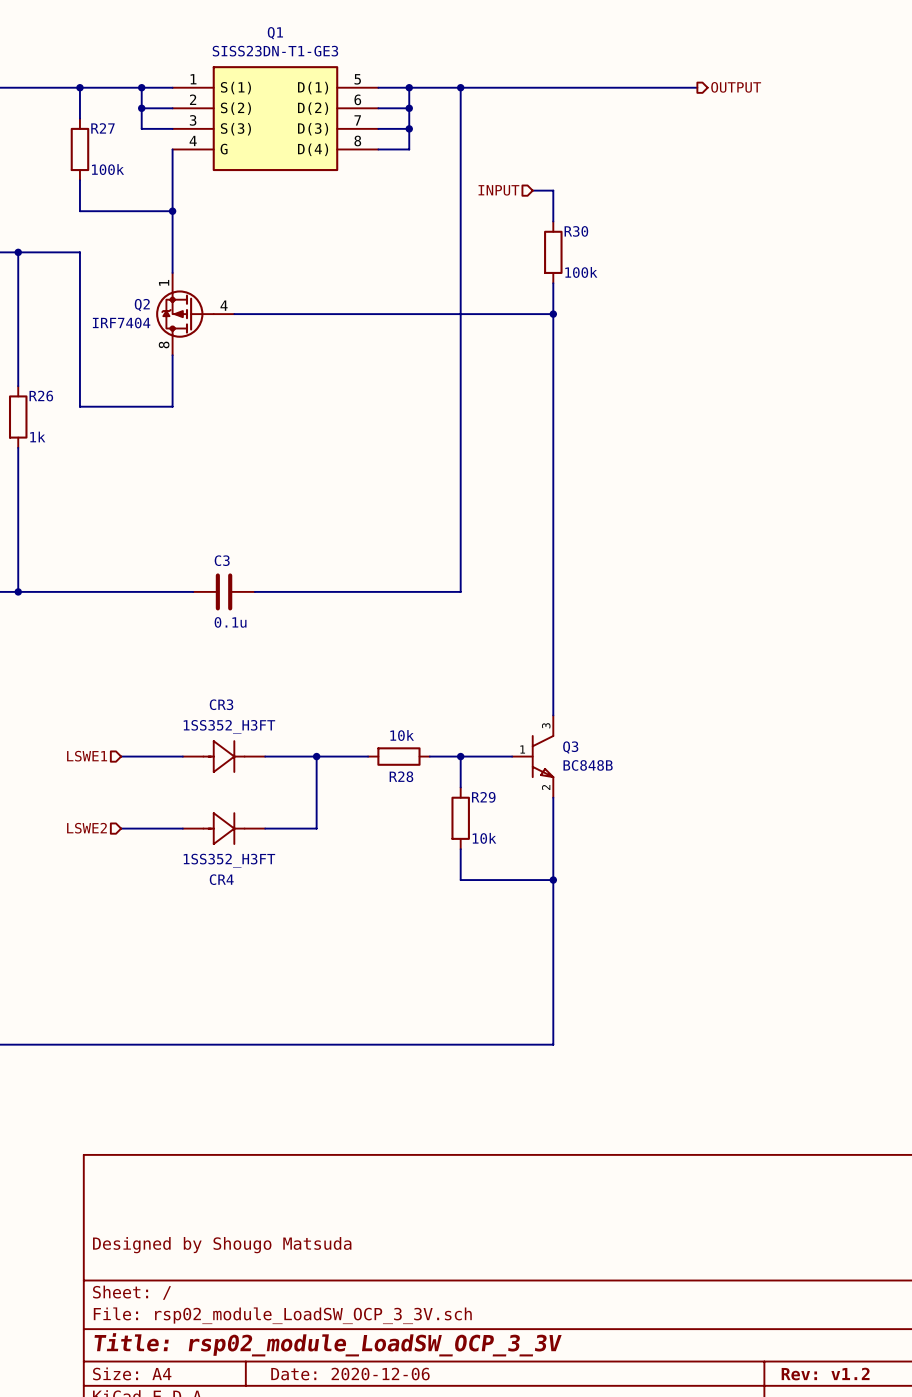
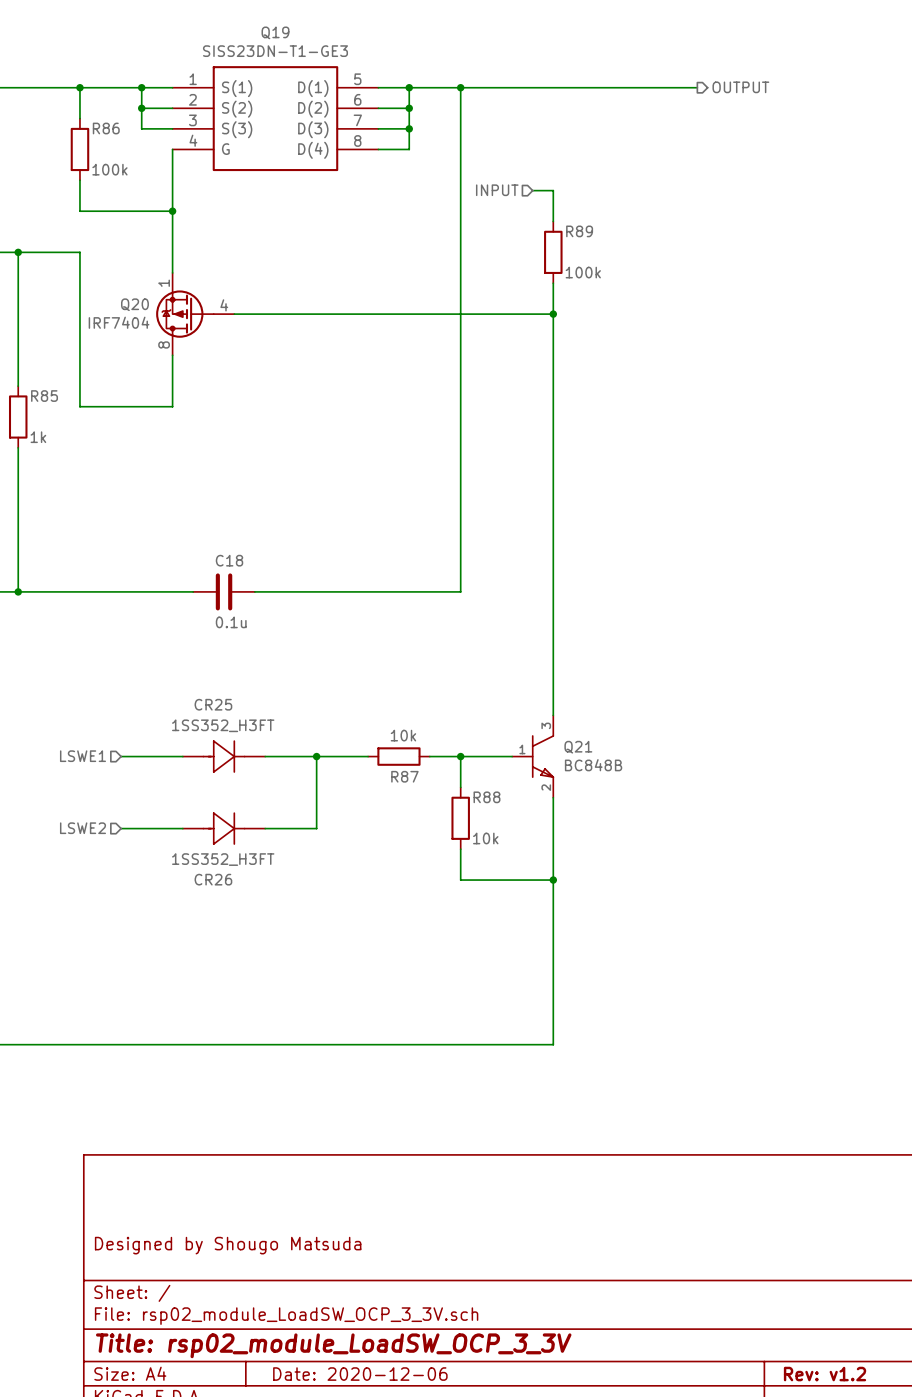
Q1 name: Q1 (275, 33) -> Q19 (275, 32)
R27 name: R27 (102, 128) -> R86 (106, 128)
R30 name: R30 (576, 231) -> R89 (579, 231)
Q2 name: Q2 (142, 305) -> Q20 (134, 304)
R26 name: R26 (41, 396) -> R85 (44, 396)
C3 name: C3 (222, 560) -> C18 (229, 560)
CR3 name: CR3 (221, 704) -> CR25 (213, 704)
Q3 name: Q3 (570, 747) -> Q21 (578, 747)
R28 name: R28 (401, 776) -> R87 (404, 776)
R29 name: R29 (483, 797) -> R88 (486, 797)
CR4 name: CR4 (221, 879) -> CR26 (213, 879)

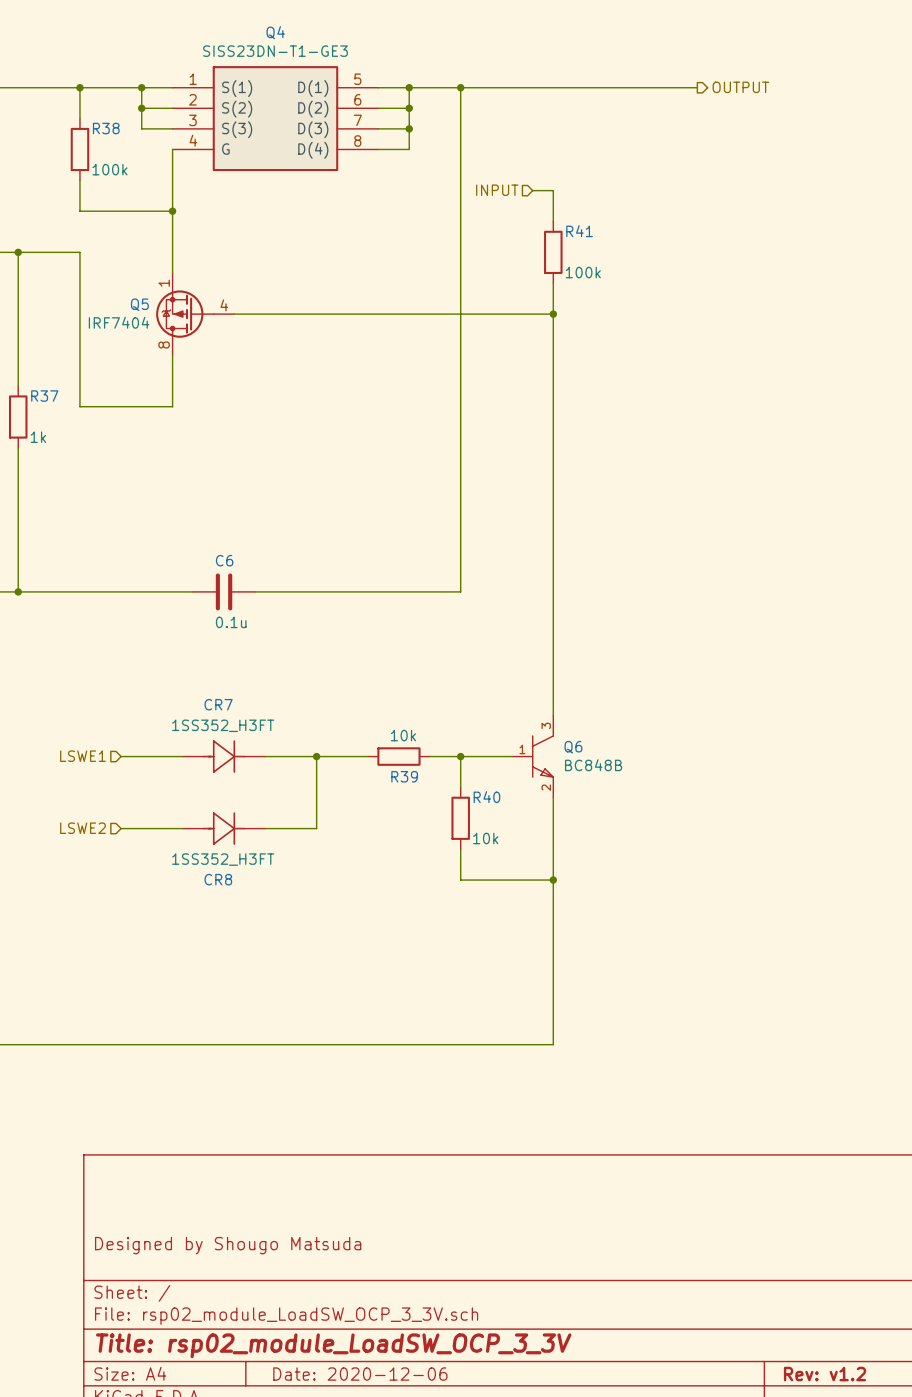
Q19 name: Q19 (275, 32) -> Q4 (275, 32)
R86 name: R86 (106, 128) -> R38 (106, 128)
R89 name: R89 (579, 231) -> R41 (579, 231)
Q20 name: Q20 (134, 304) -> Q5 (139, 304)
R85 name: R85 (44, 396) -> R37 (44, 396)
C18 name: C18 (229, 560) -> C6 (224, 560)
CR25 name: CR25 (213, 704) -> CR7 (218, 704)
Q21 name: Q21 (578, 747) -> Q6 (573, 747)
R87 name: R87 (404, 776) -> R39 (404, 776)
R88 name: R88 (486, 797) -> R40 (486, 797)
CR26 name: CR26 (213, 879) -> CR8 (218, 879)

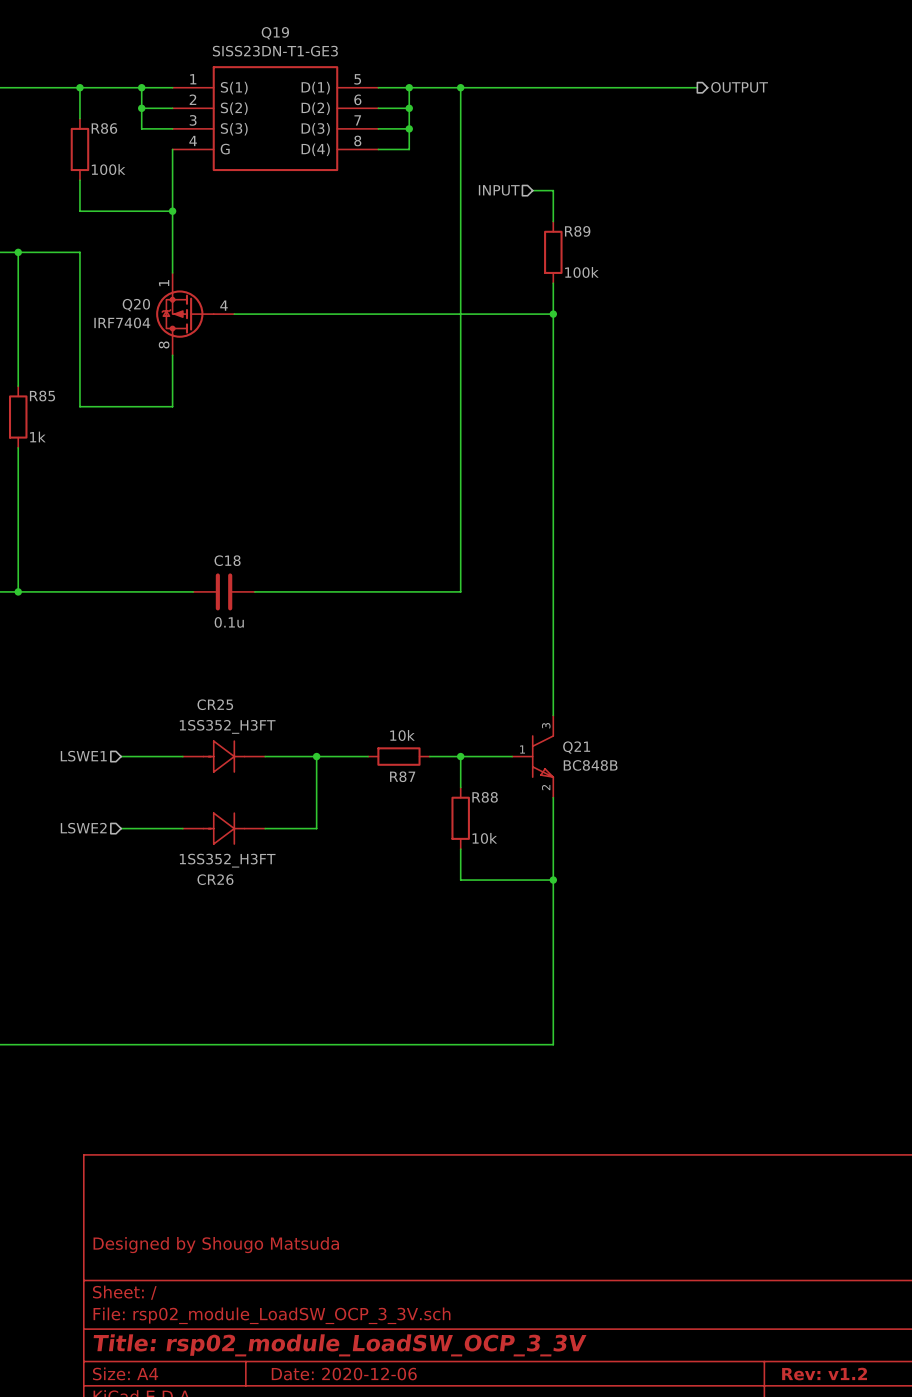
Q4 name: Q4 (275, 32) -> Q19 (275, 33)
R38 name: R38 (106, 128) -> R86 (104, 128)
R41 name: R41 (579, 231) -> R89 (577, 231)
Q5 name: Q5 (139, 304) -> Q20 (136, 305)
R37 name: R37 (44, 396) -> R85 (42, 396)
C6 name: C6 (224, 560) -> C18 (227, 560)
CR7 name: CR7 (218, 704) -> CR25 (215, 704)
Q6 name: Q6 (573, 747) -> Q21 (576, 747)
R39 name: R39 (404, 776) -> R87 (402, 776)
R40 name: R40 (486, 797) -> R88 (485, 797)
CR8 name: CR8 (218, 879) -> CR26 (215, 879)

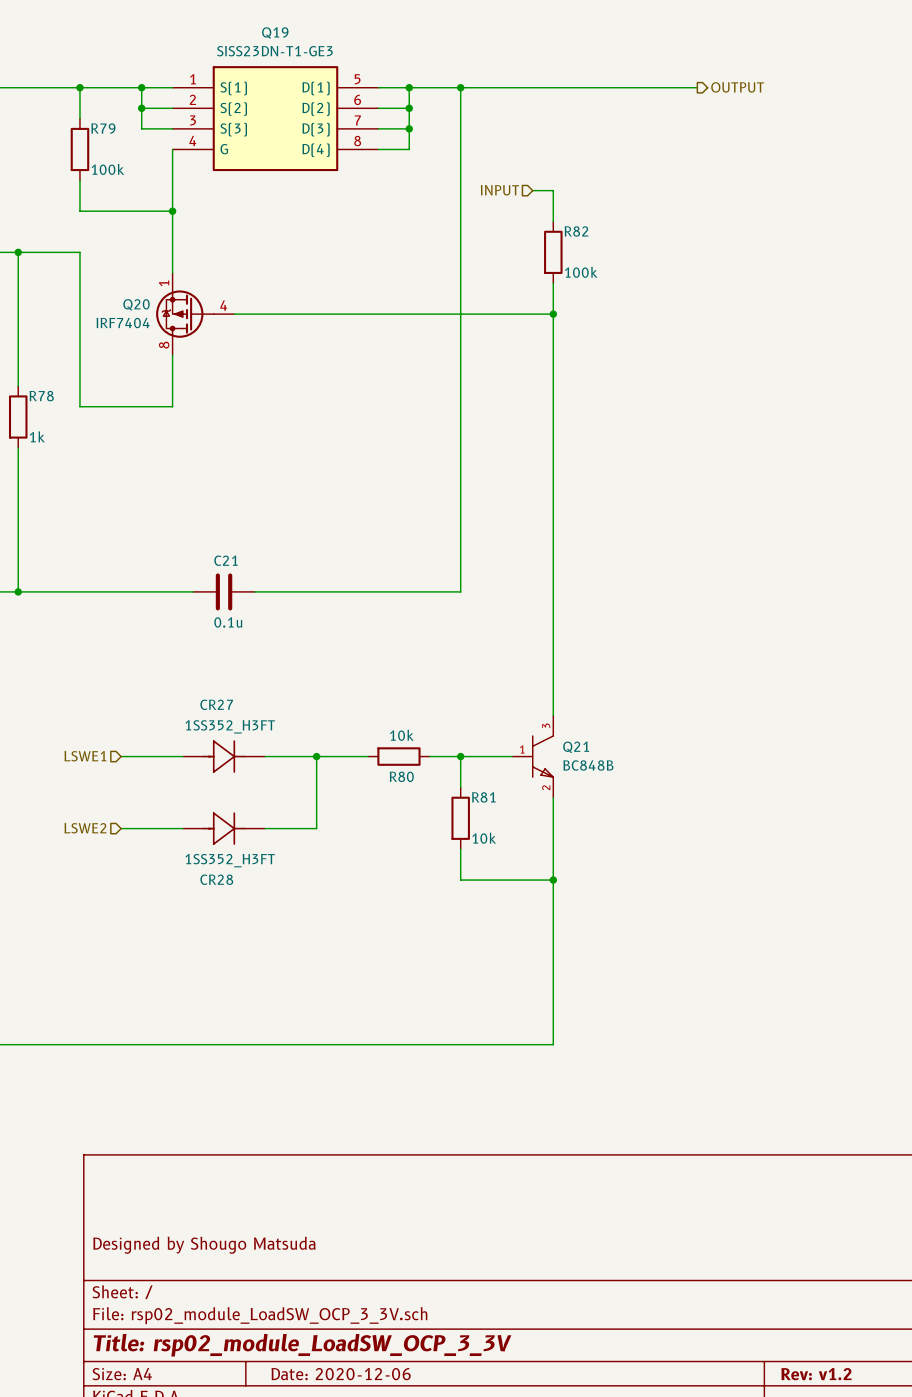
R86 name: R86 (104, 128) -> R79 (103, 128)
R89 name: R89 (577, 231) -> R82 (576, 231)
R85 name: R85 (42, 396) -> R78 (41, 396)
C18 name: C18 (227, 560) -> C21 (226, 560)
CR25 name: CR25 (215, 704) -> CR27 (216, 704)
R87 name: R87 (402, 776) -> R80 (401, 776)
R88 name: R88 (485, 797) -> R81 (483, 797)
CR26 name: CR26 (215, 879) -> CR28 (216, 879)

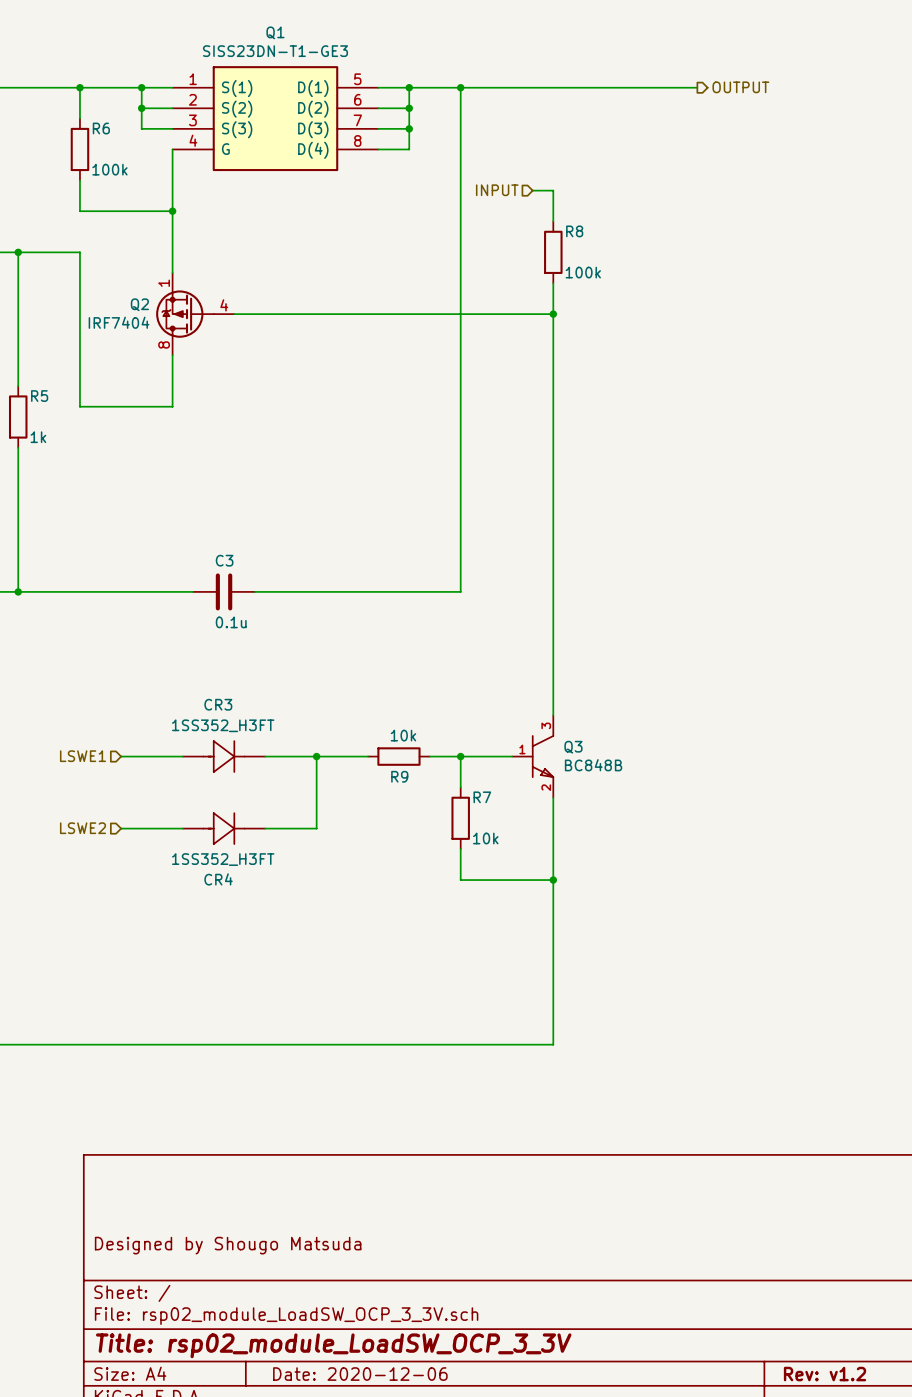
Q19 name: Q19 (275, 32) -> Q1 (275, 32)
R79 name: R79 (103, 128) -> R6 (101, 128)
R82 name: R82 (576, 231) -> R8 (574, 231)
Q20 name: Q20 (136, 304) -> Q2 (139, 304)
R78 name: R78 (41, 396) -> R5 (39, 396)
C21 name: C21 (226, 560) -> C3 (224, 560)
CR27 name: CR27 (216, 704) -> CR3 (218, 704)
Q21 name: Q21 (576, 747) -> Q3 (573, 747)
R80 name: R80 (401, 776) -> R9 (399, 776)
R81 name: R81 (483, 797) -> R7 (482, 797)
CR28 name: CR28 (216, 879) -> CR4 (218, 879)

